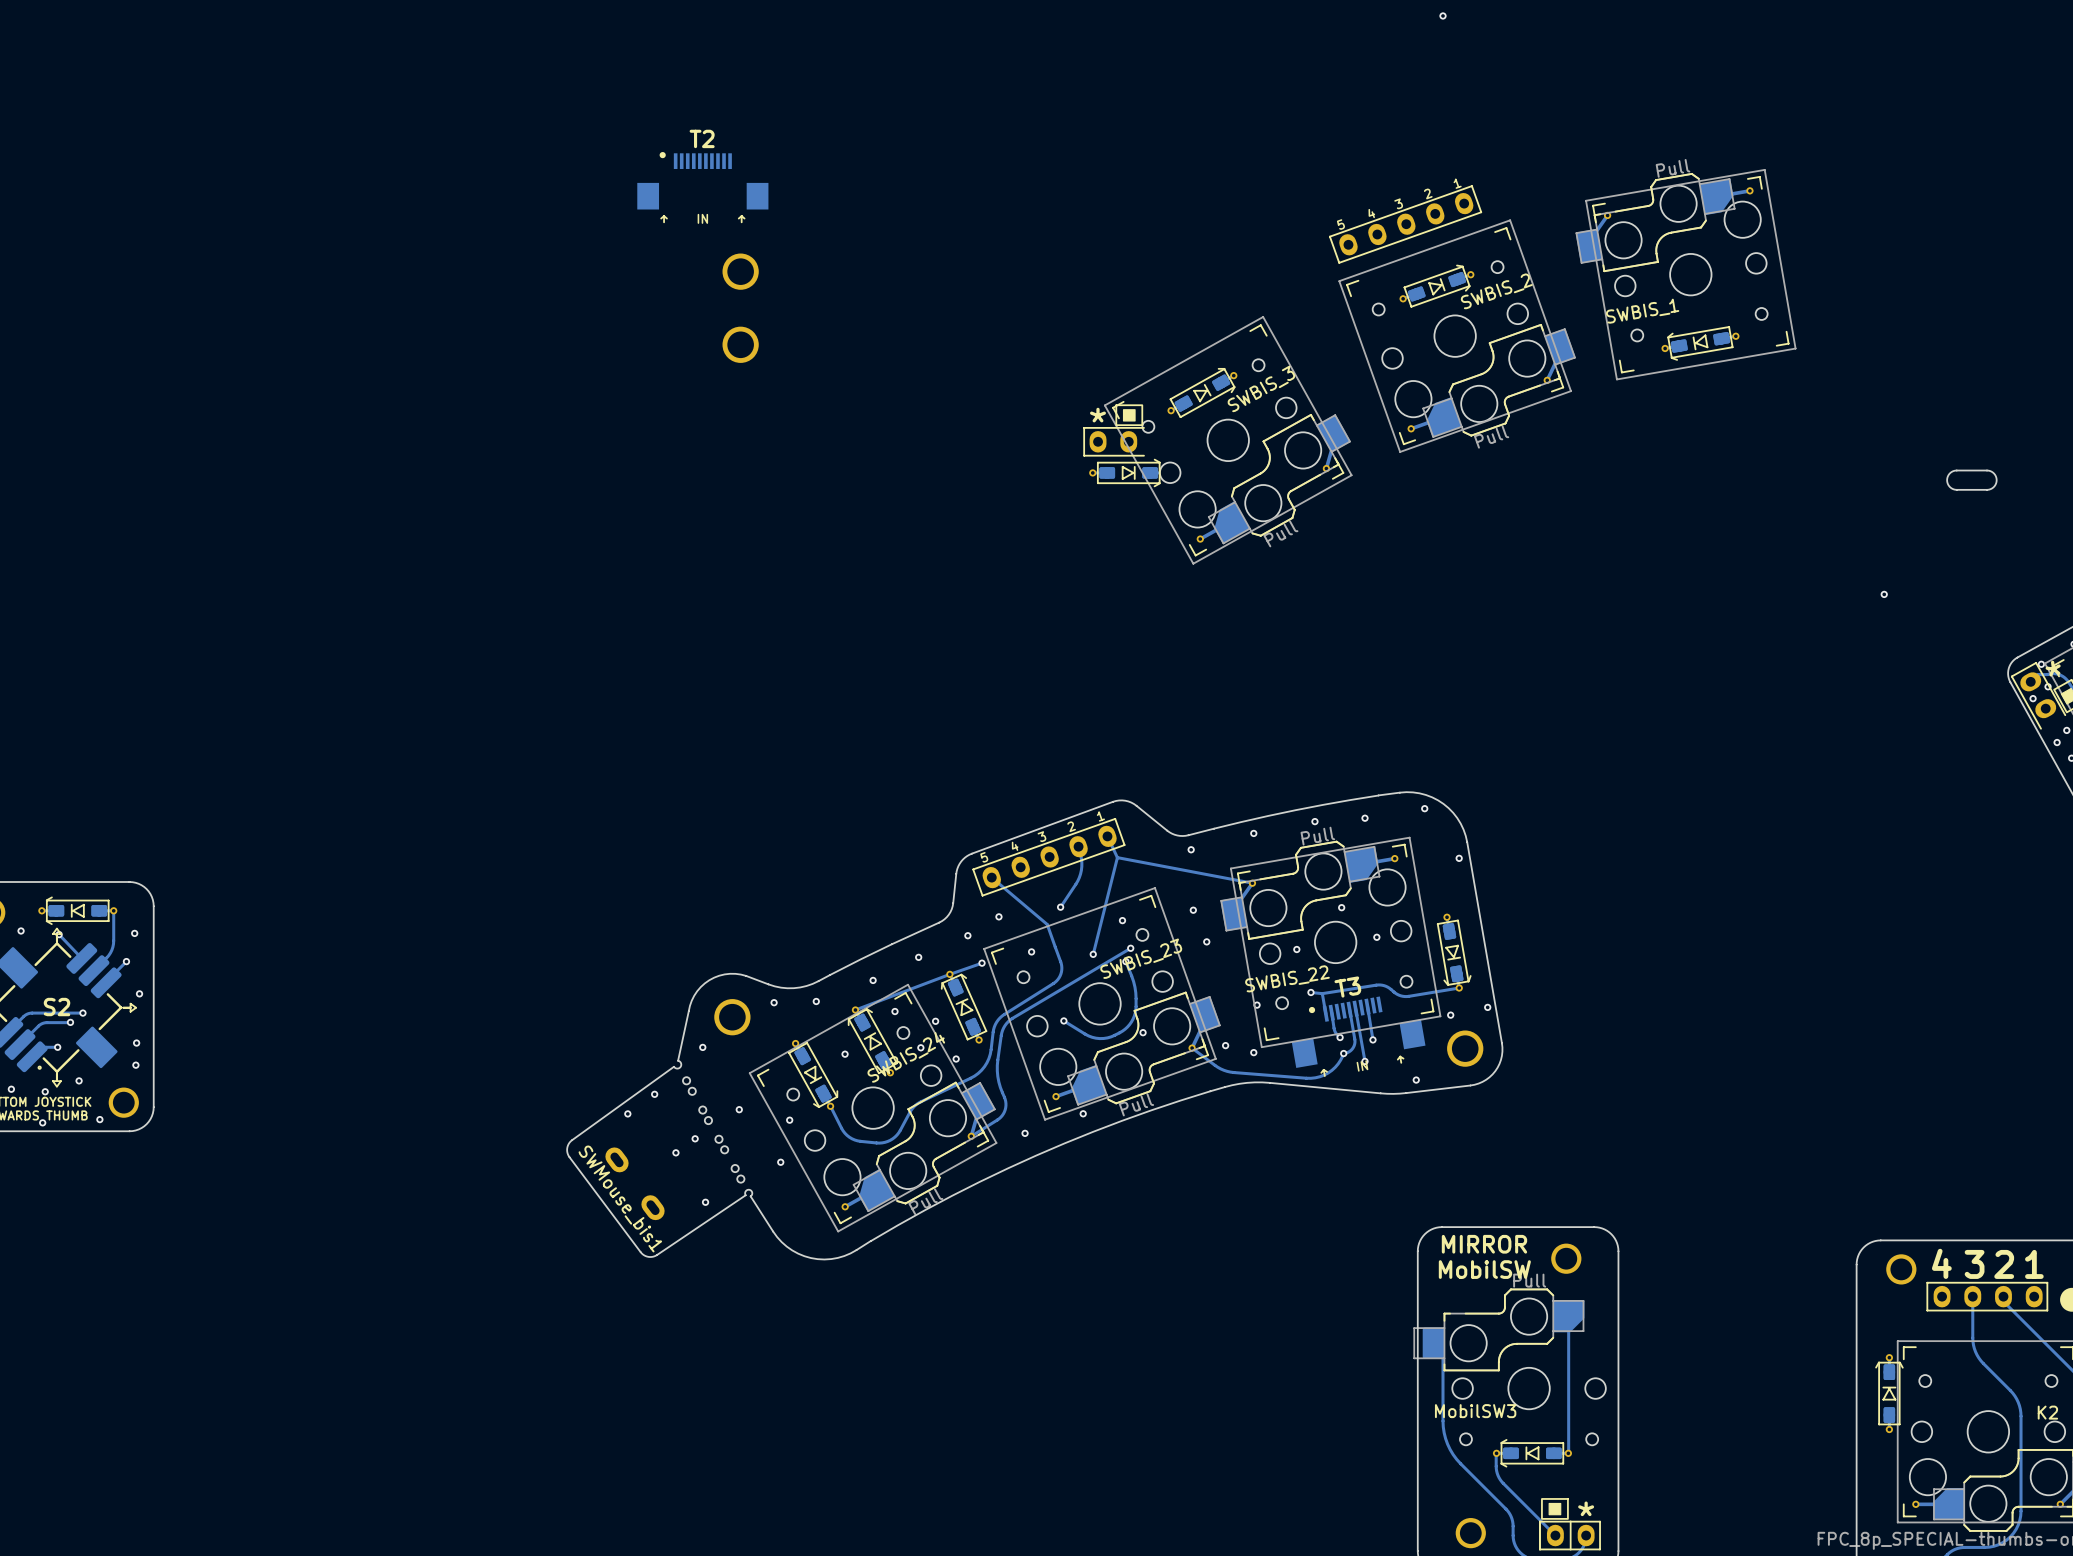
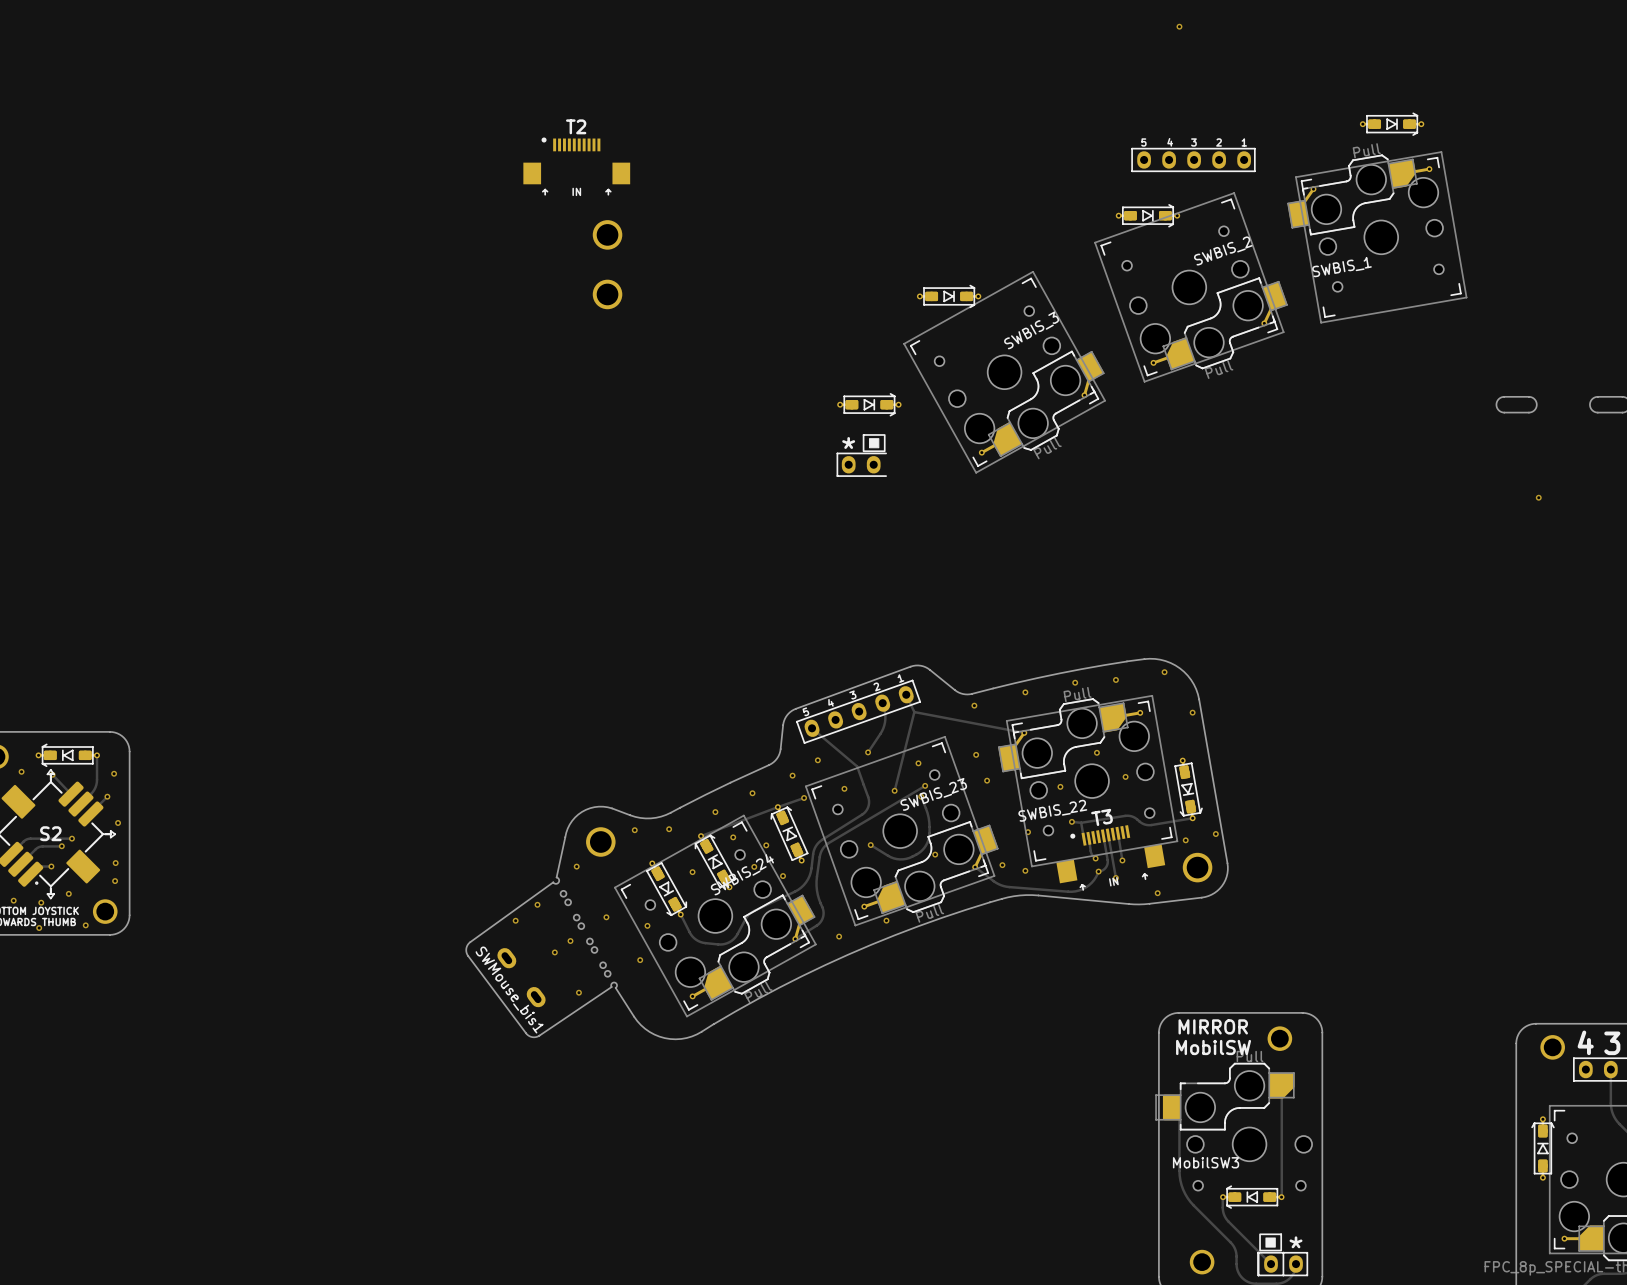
part: none -> (1392, 124)
part: none -> (1199, 155)
part: (1406, 217) -> none
part: none -> (1147, 215)
part: (1436, 286) -> none
part: (1700, 343) -> none
part: none -> (949, 296)
part: (1202, 393) -> none
part position: (1114, 430) -> (861, 455)
board edge: none -> (1528, 396) (1502, 397) (1497, 400) (1496, 406) (1503, 412) (1530, 412) (1535, 409) (1536, 403) (1534, 398) (1528, 396)
part: (1128, 472) -> none
part: none -> (869, 404)

